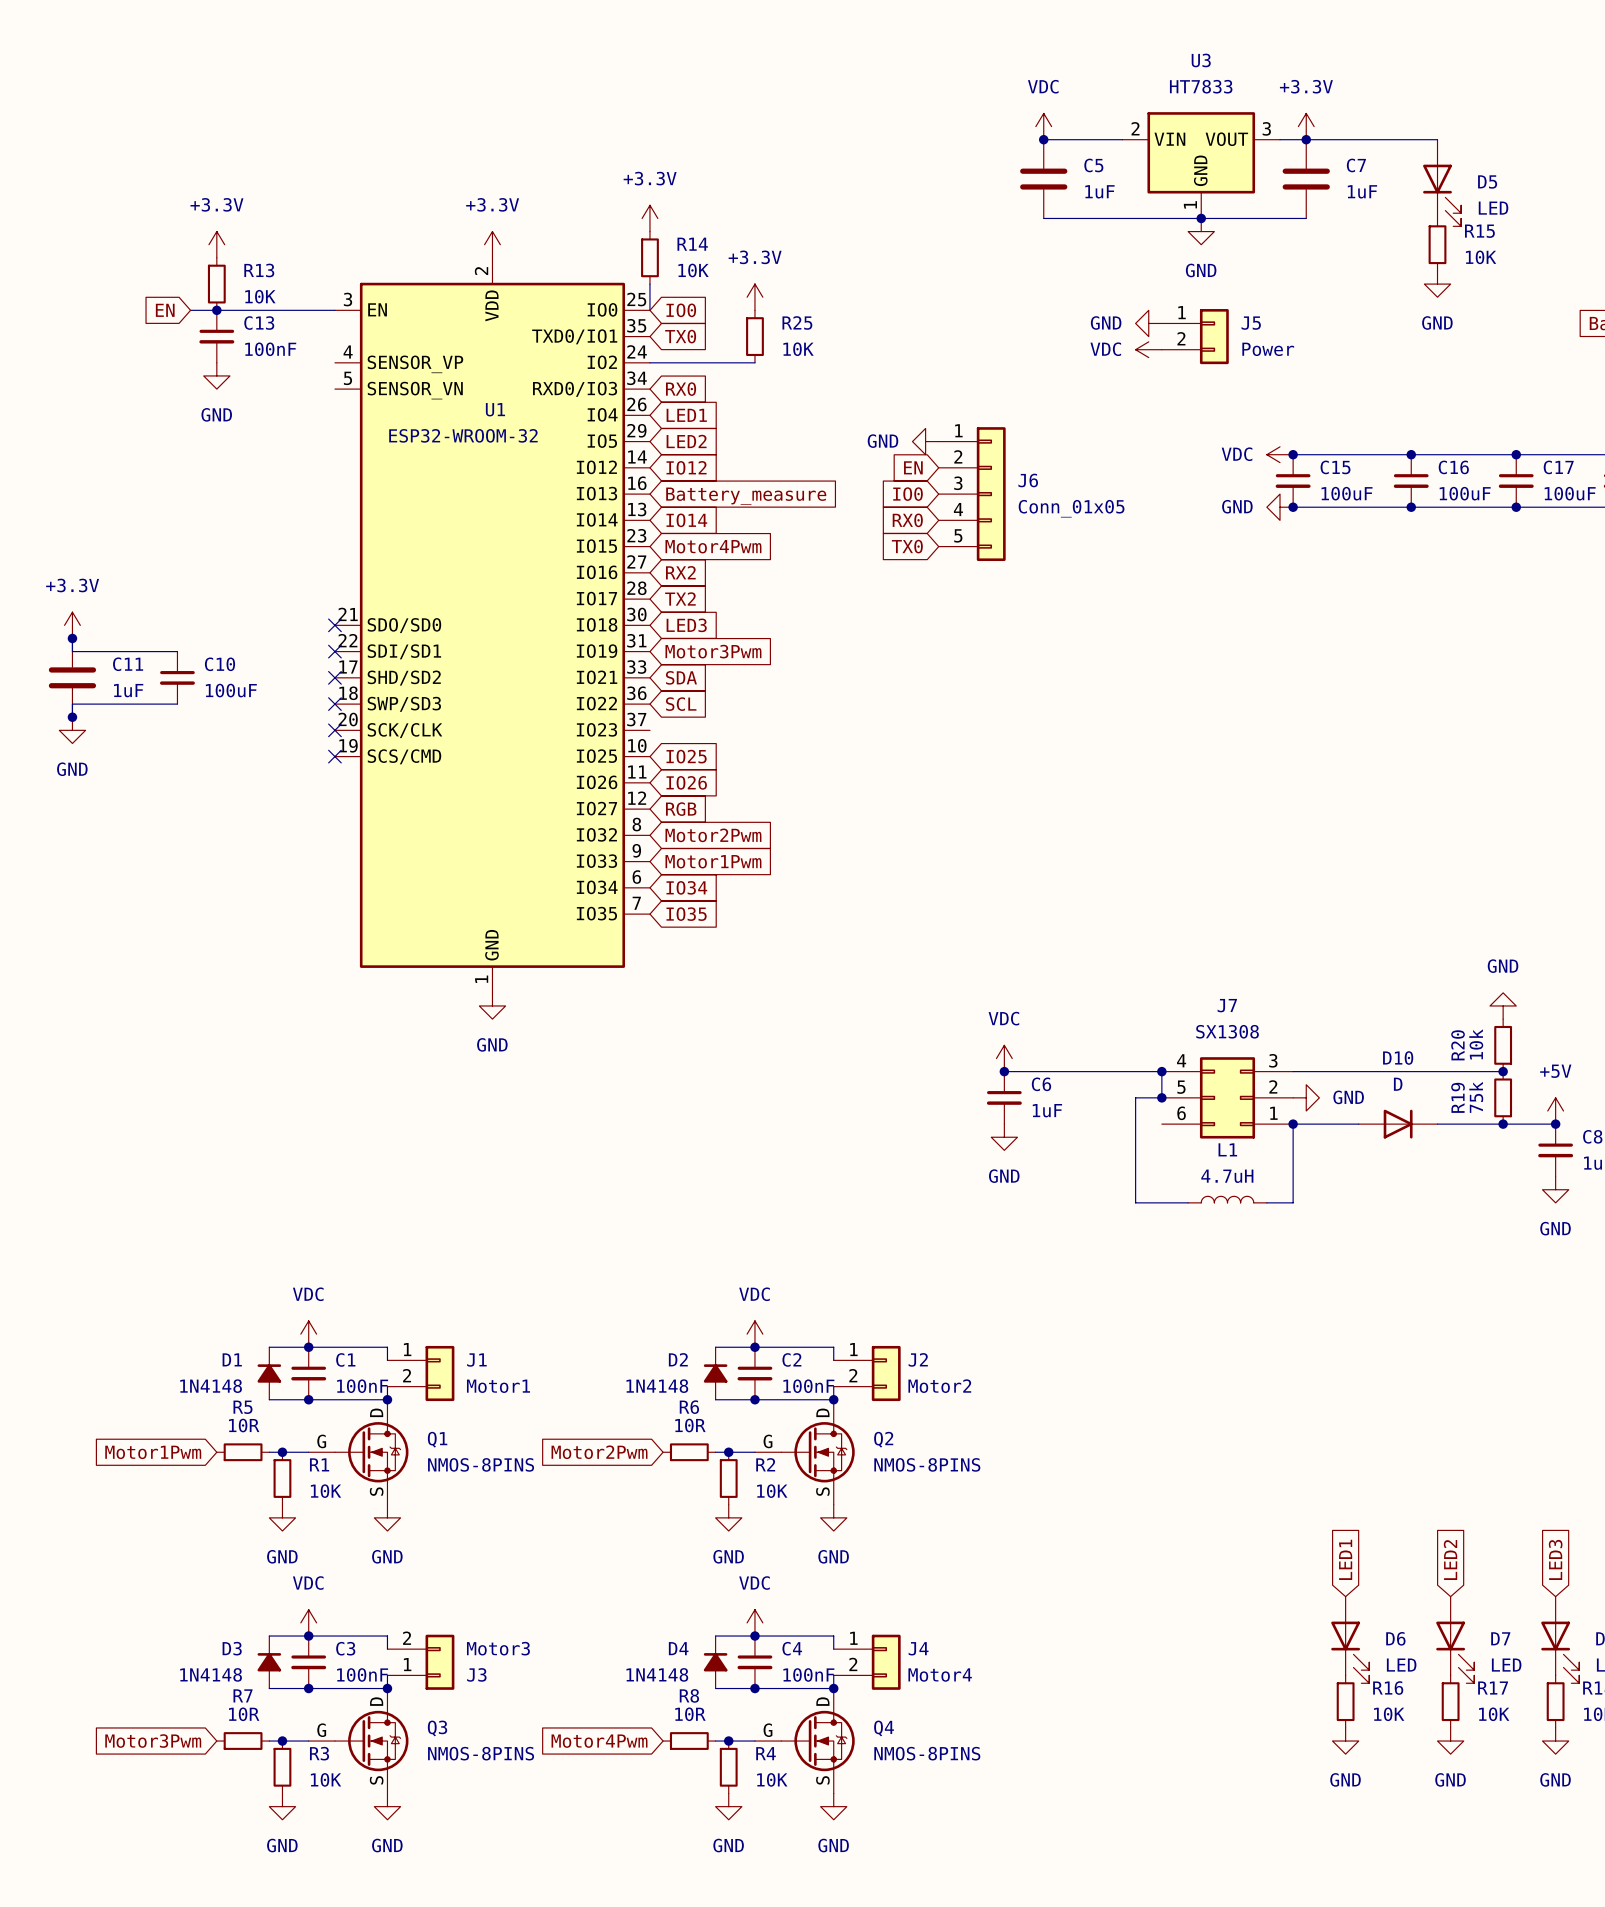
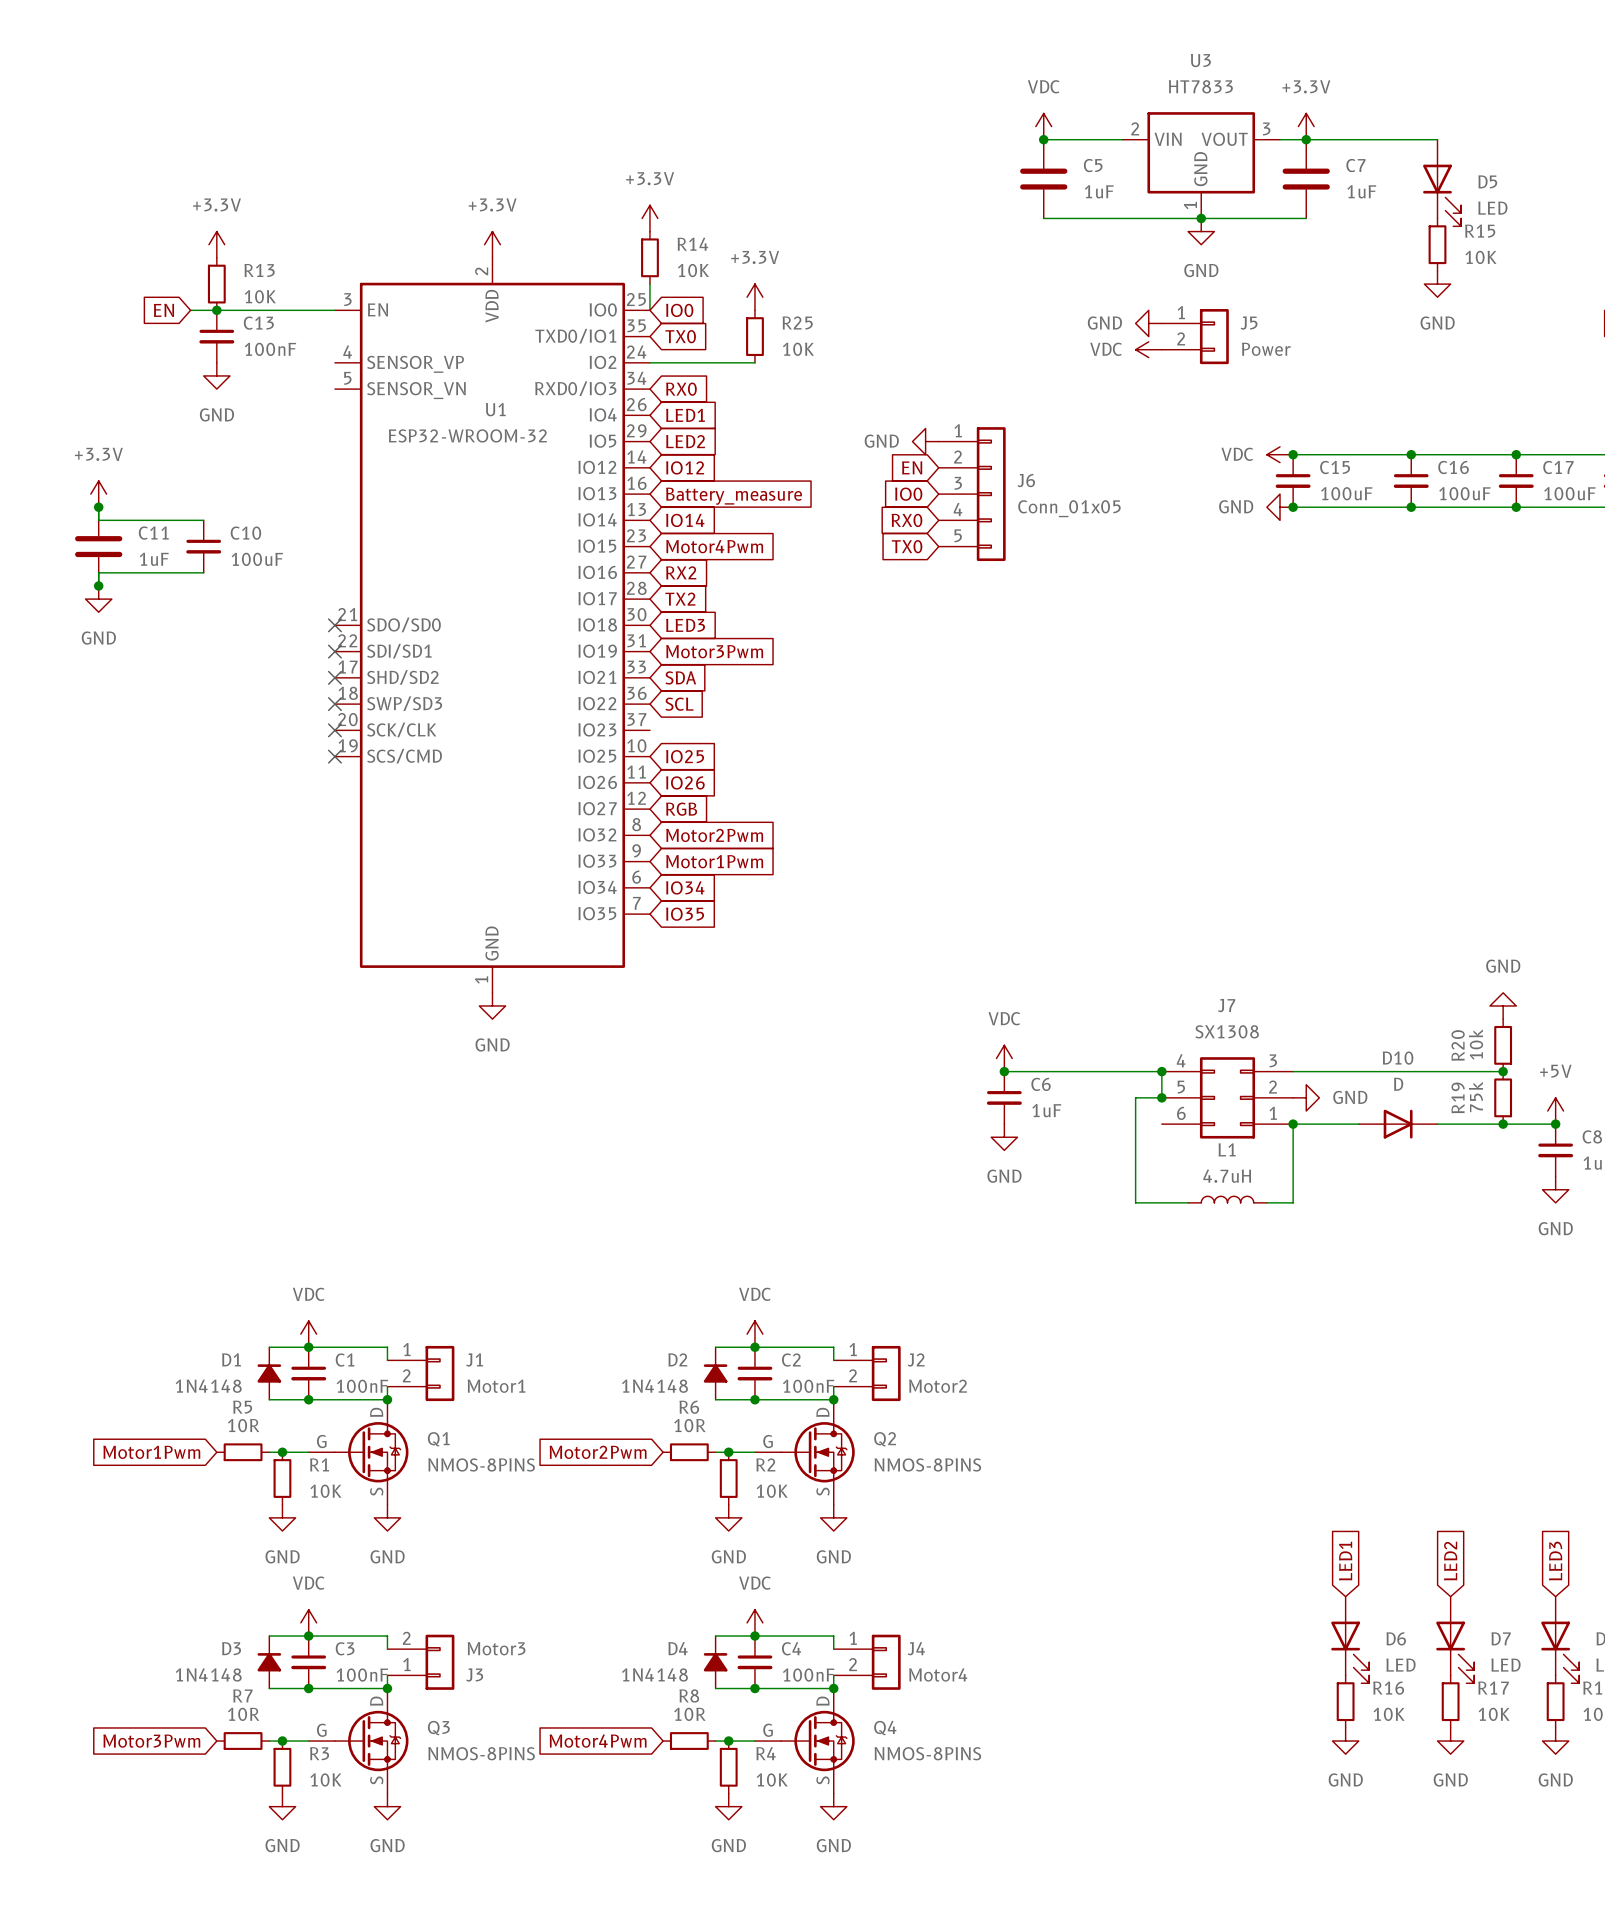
junction: none -> (98, 507)
power symbol position: +3.3V (72, 625) -> +3.3V (98, 494)
wire: (72, 638) (72, 651) (177, 651) -> (98, 507) (98, 520) (203, 520)
junction position: (72, 638) -> (98, 585)
C11 position: (72, 677) -> (98, 546)
C10 position: (177, 677) -> (203, 546)
wire: (177, 704) (72, 704) (72, 717) -> (203, 572) (98, 572) (98, 585)
junction: (72, 717) -> none
power symbol position: GND (72, 730) -> GND (98, 599)

